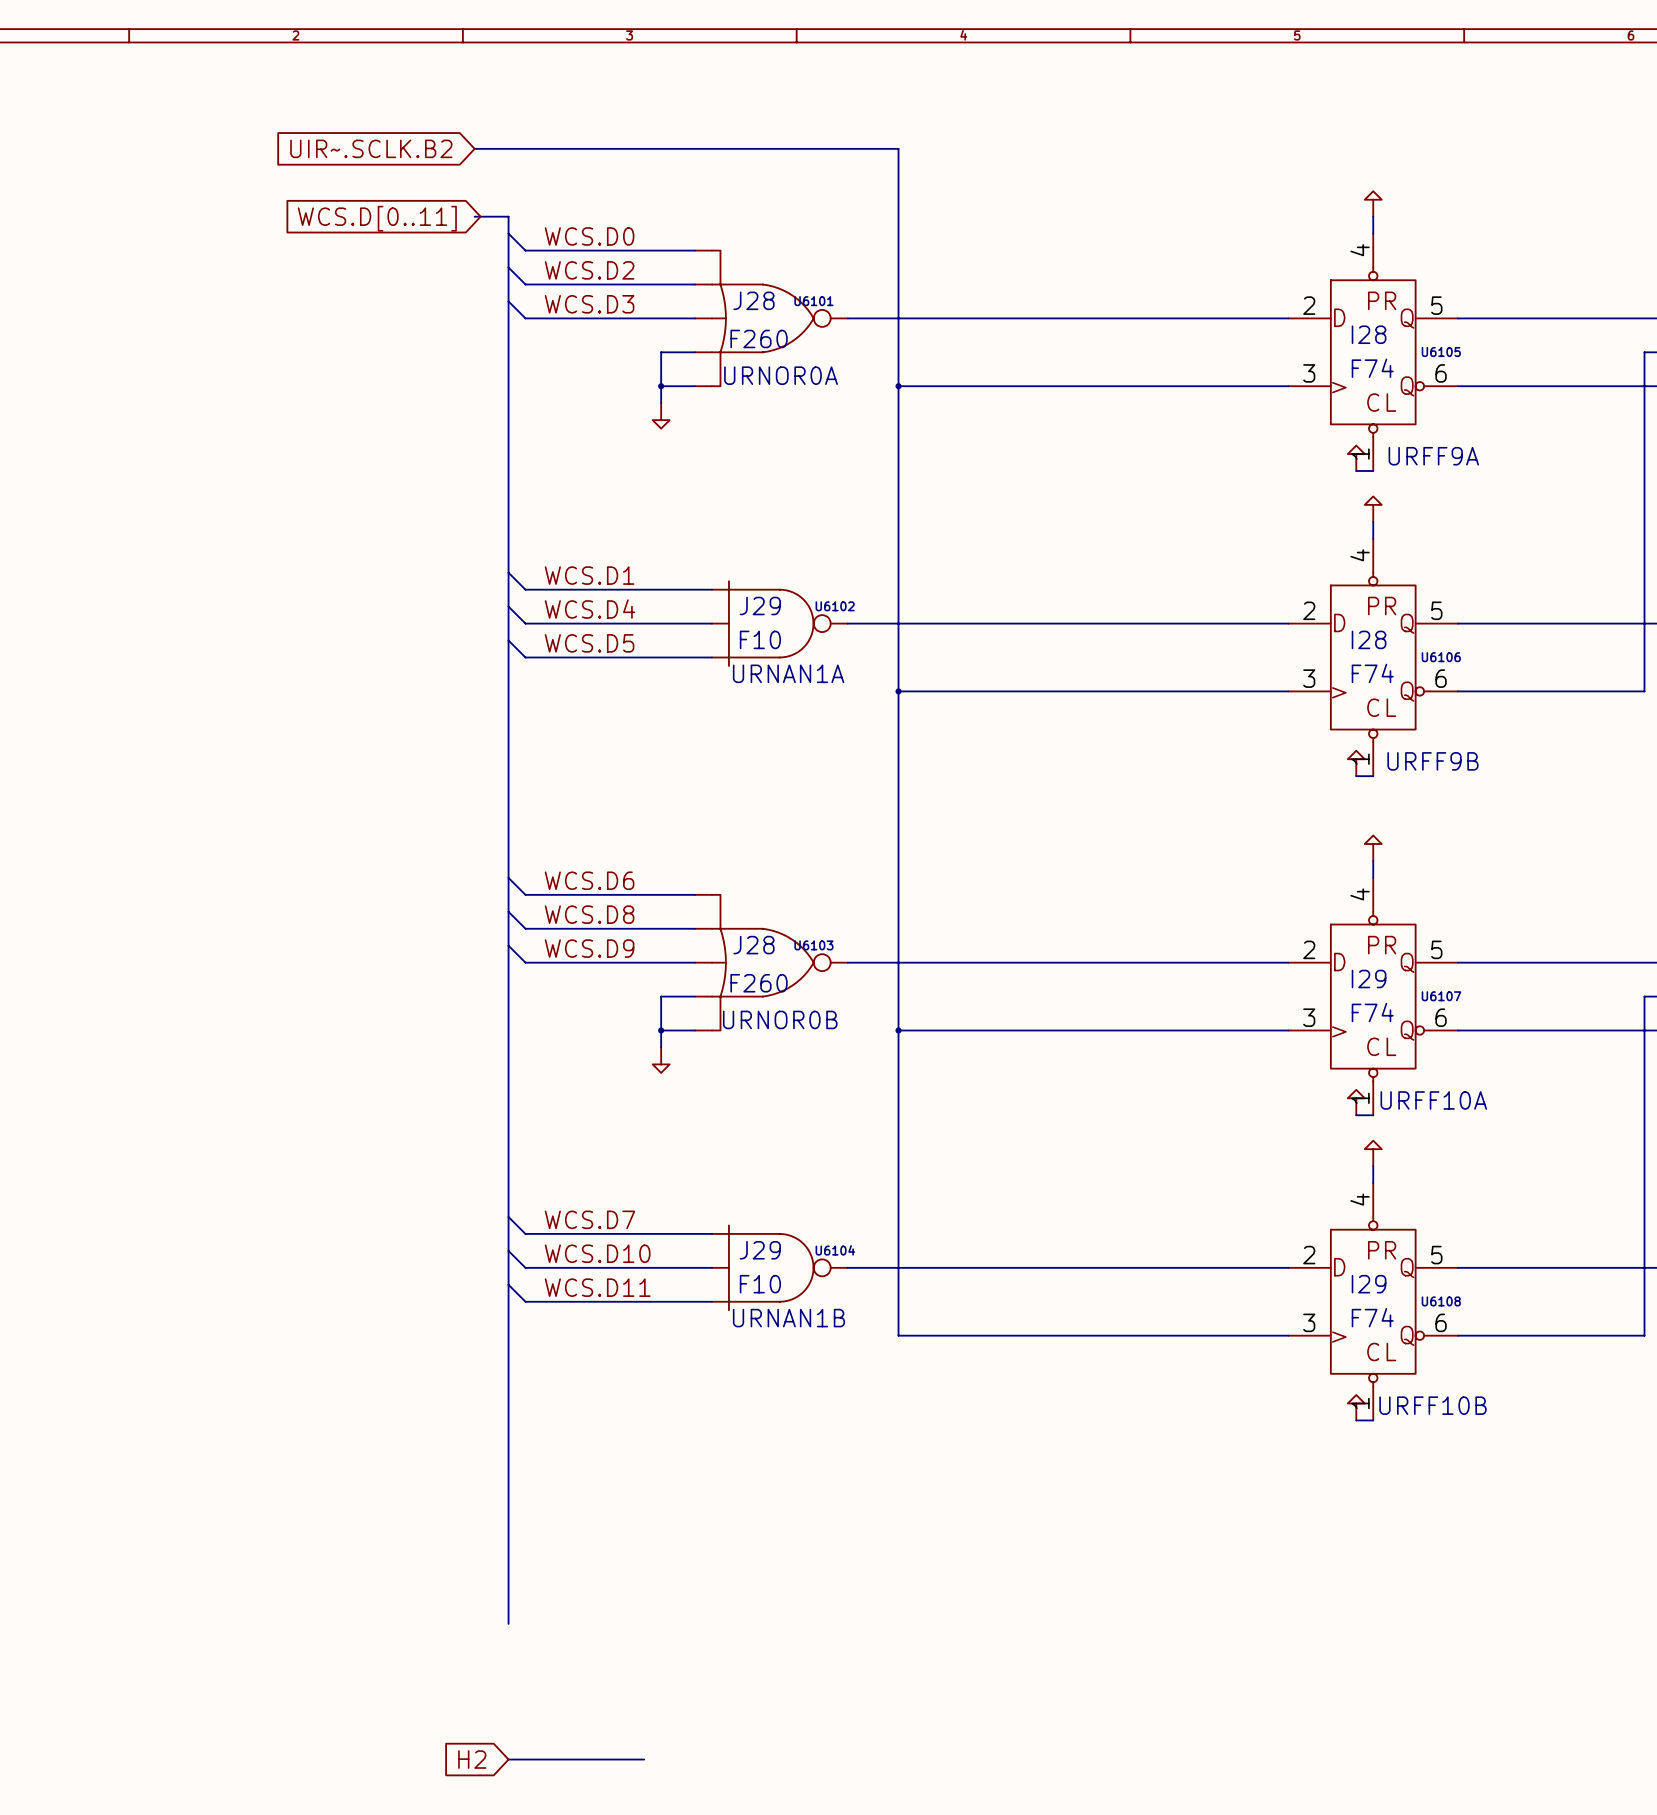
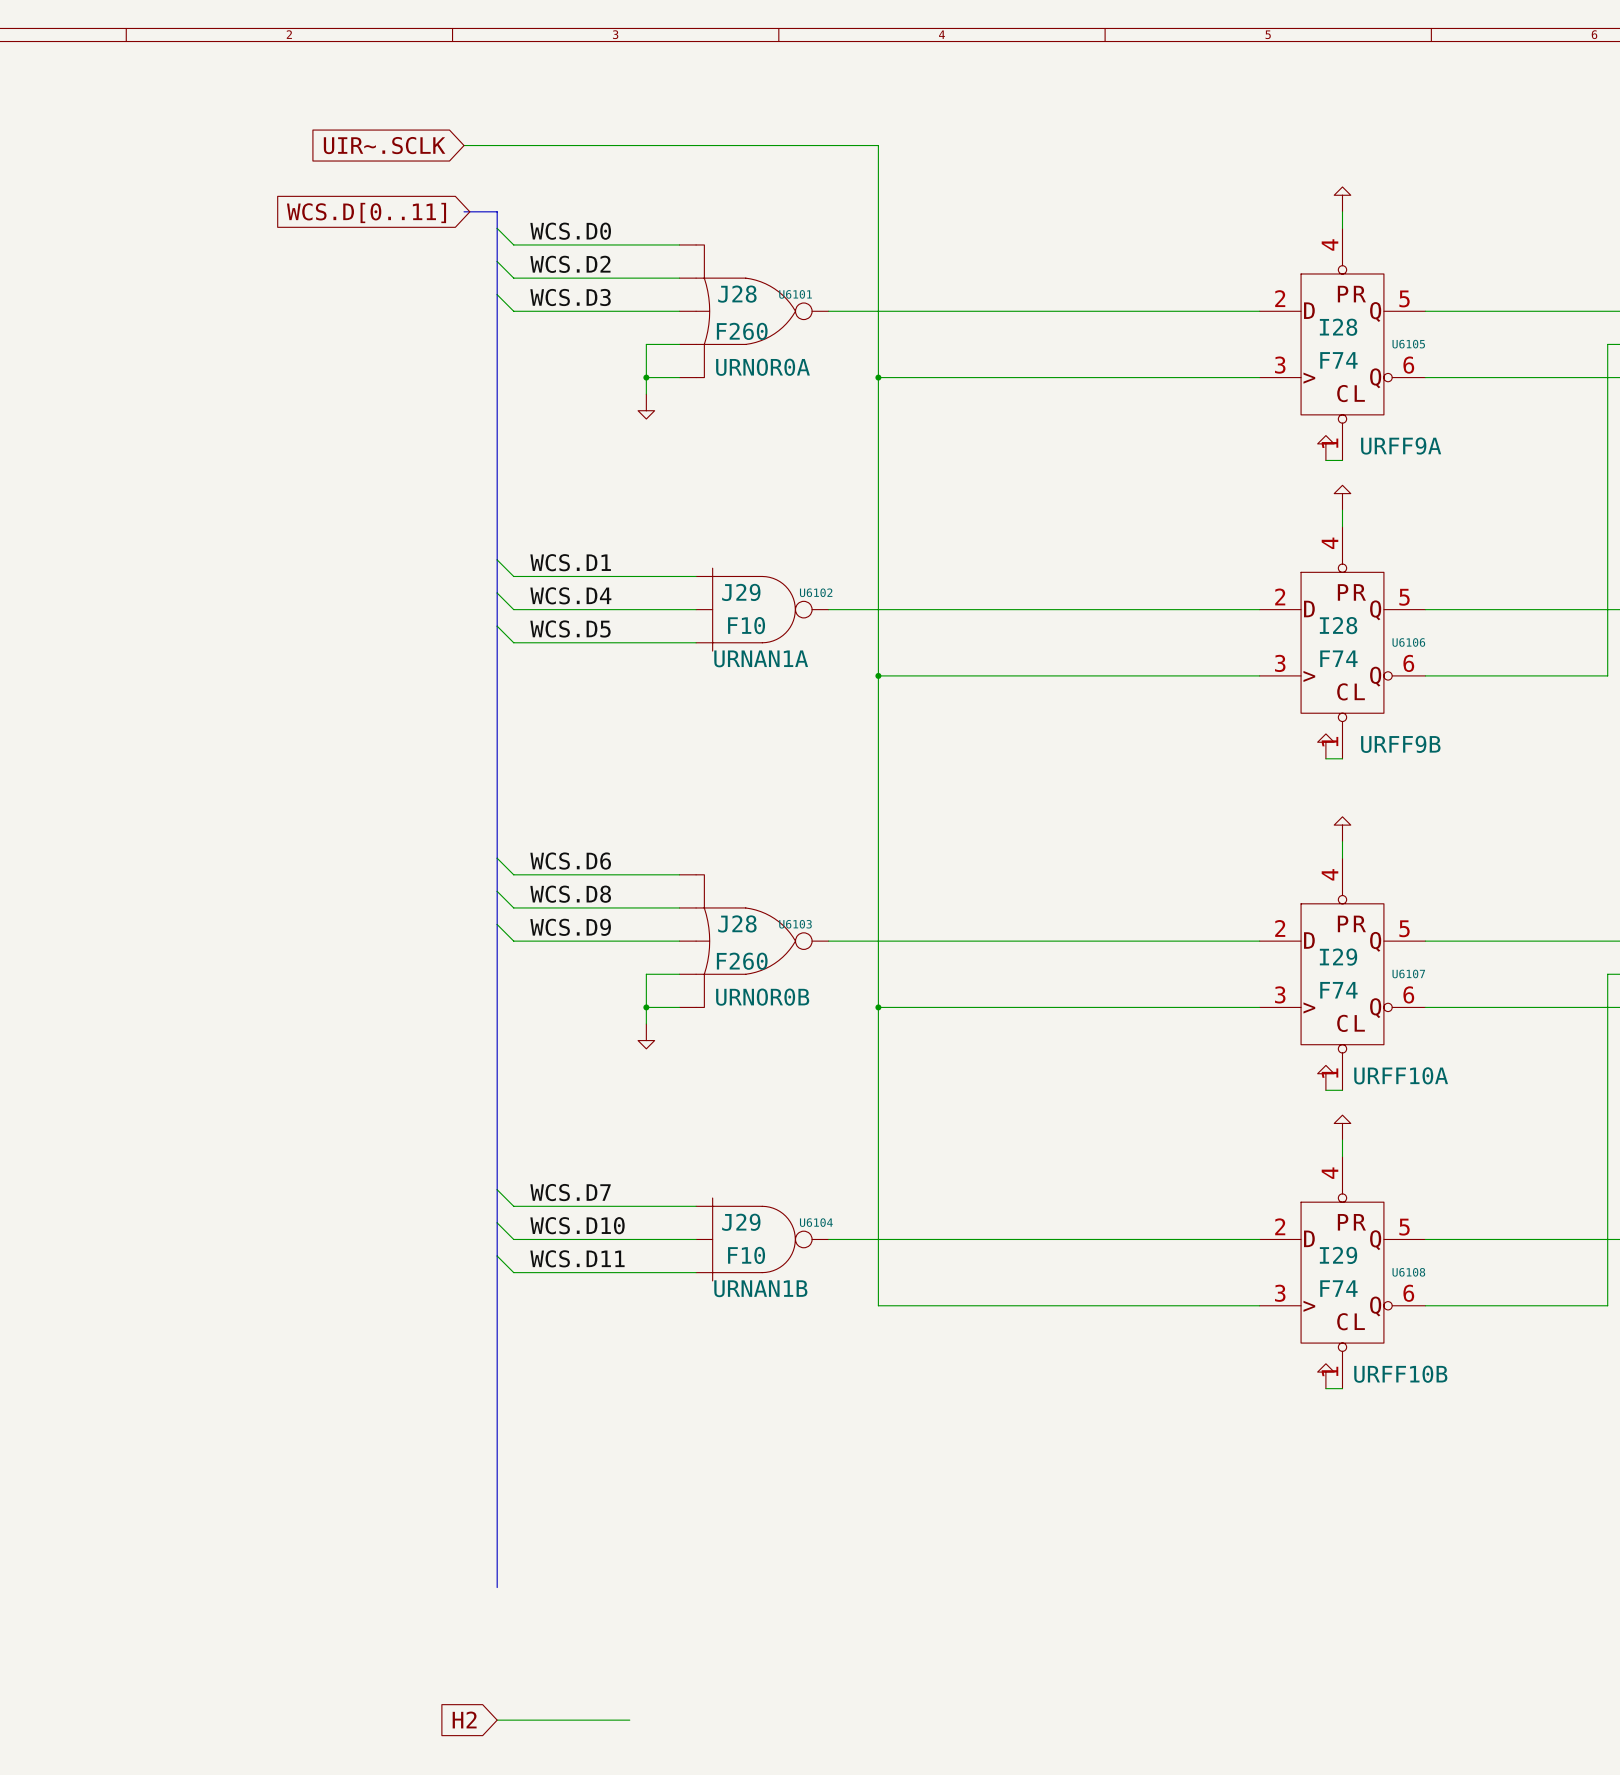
global label: UIR~.SCLK.B2 (371, 148) -> UIR~.SCLK (384, 145)

